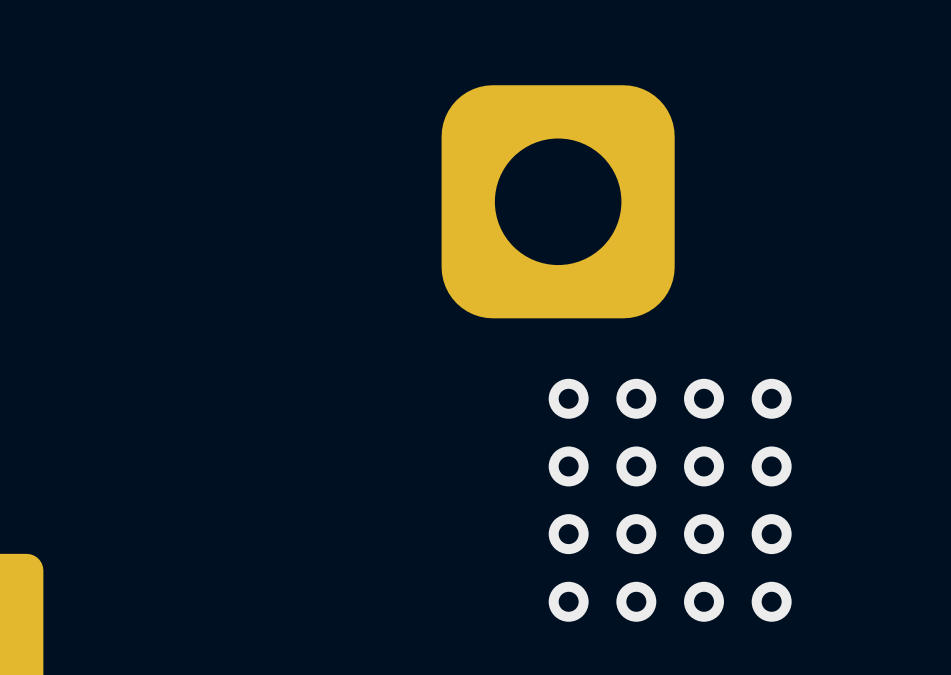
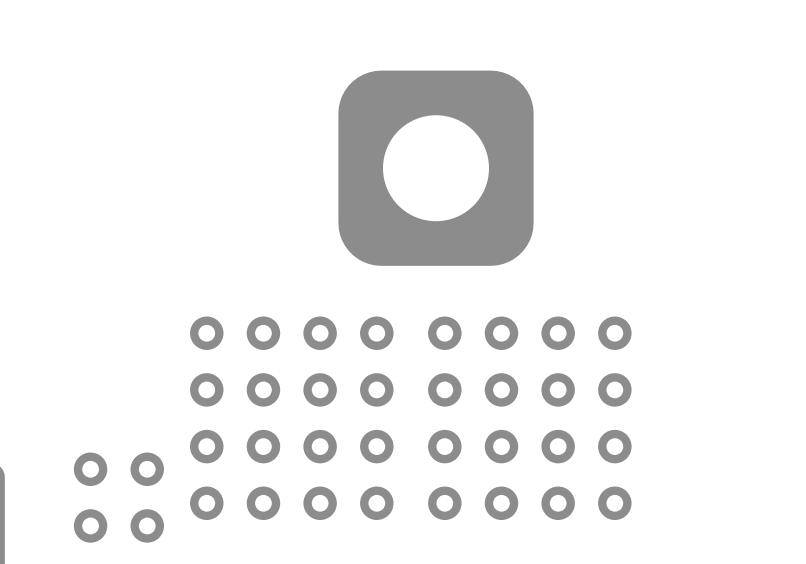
via: none -> (206, 333)
via: none -> (263, 333)
via: none -> (320, 333)
via: none -> (376, 333)
via: none -> (206, 389)
via: none -> (263, 389)
via: none -> (320, 389)
via: none -> (376, 389)
via: none -> (206, 446)
via: none -> (263, 446)
via: none -> (320, 446)
via: none -> (376, 446)
via: none -> (90, 469)
via: none -> (147, 469)
via: none -> (206, 503)
via: none -> (263, 503)
via: none -> (320, 503)
via: none -> (376, 503)
via: none -> (90, 525)
via: none -> (147, 525)

